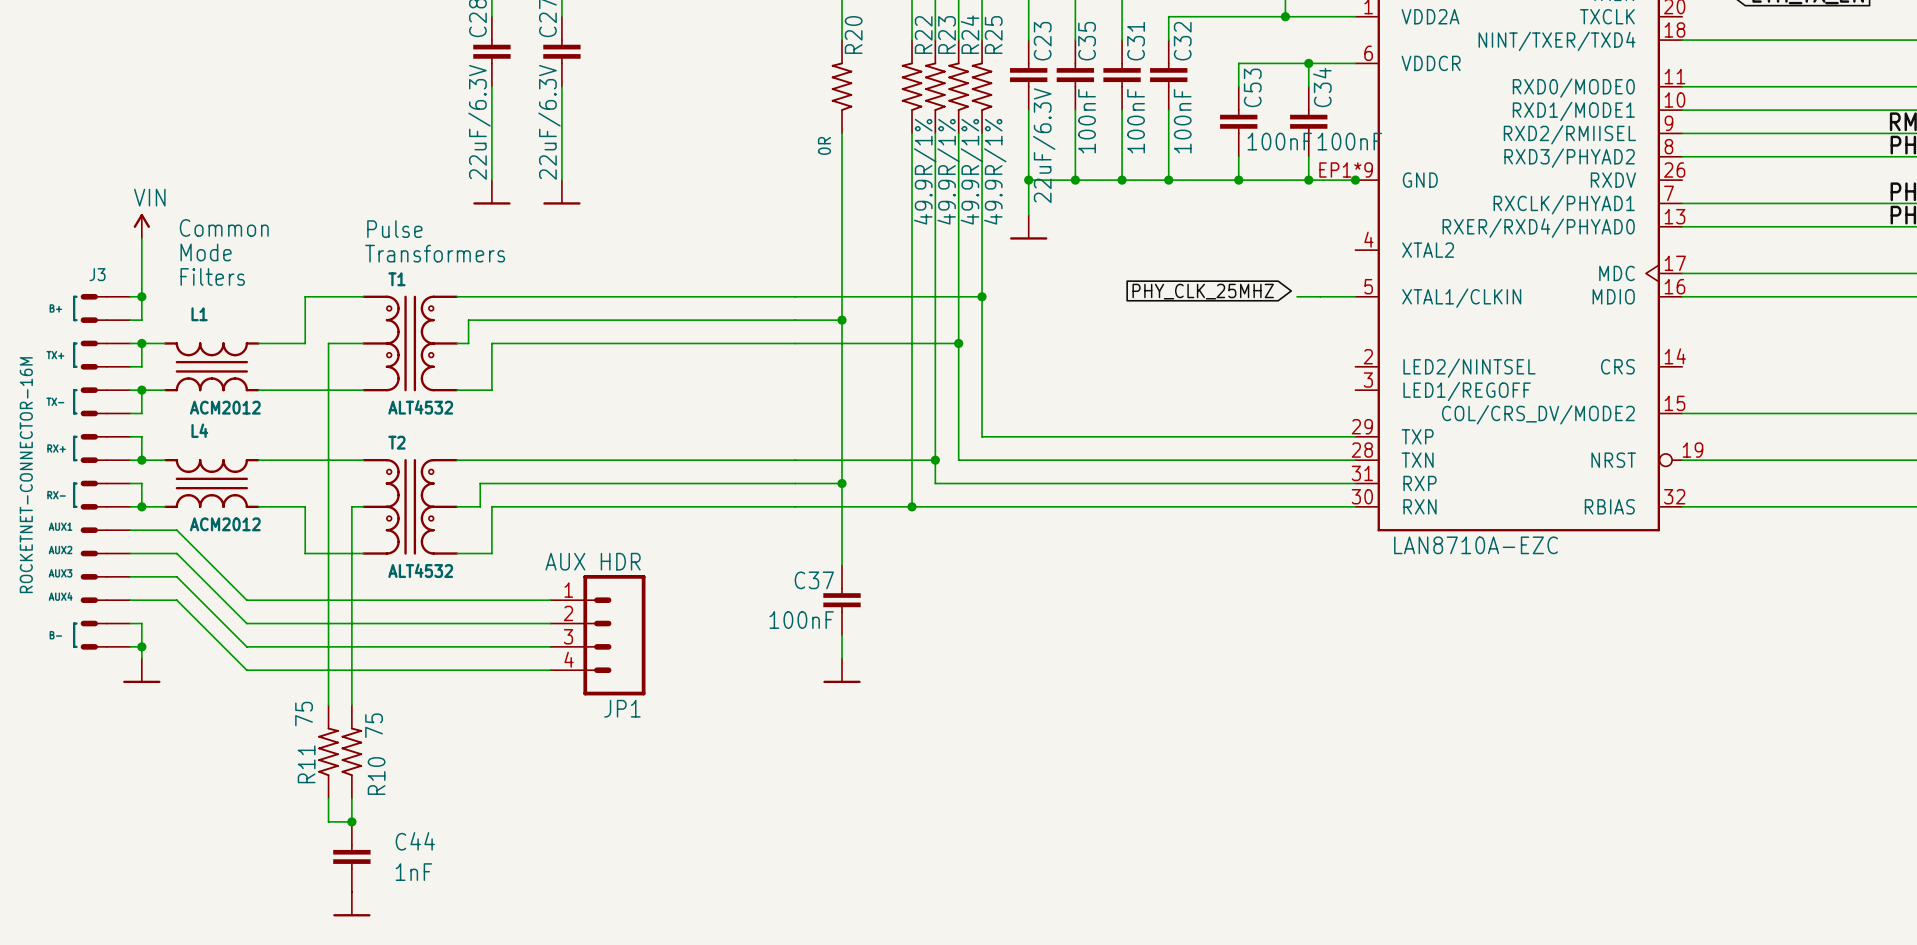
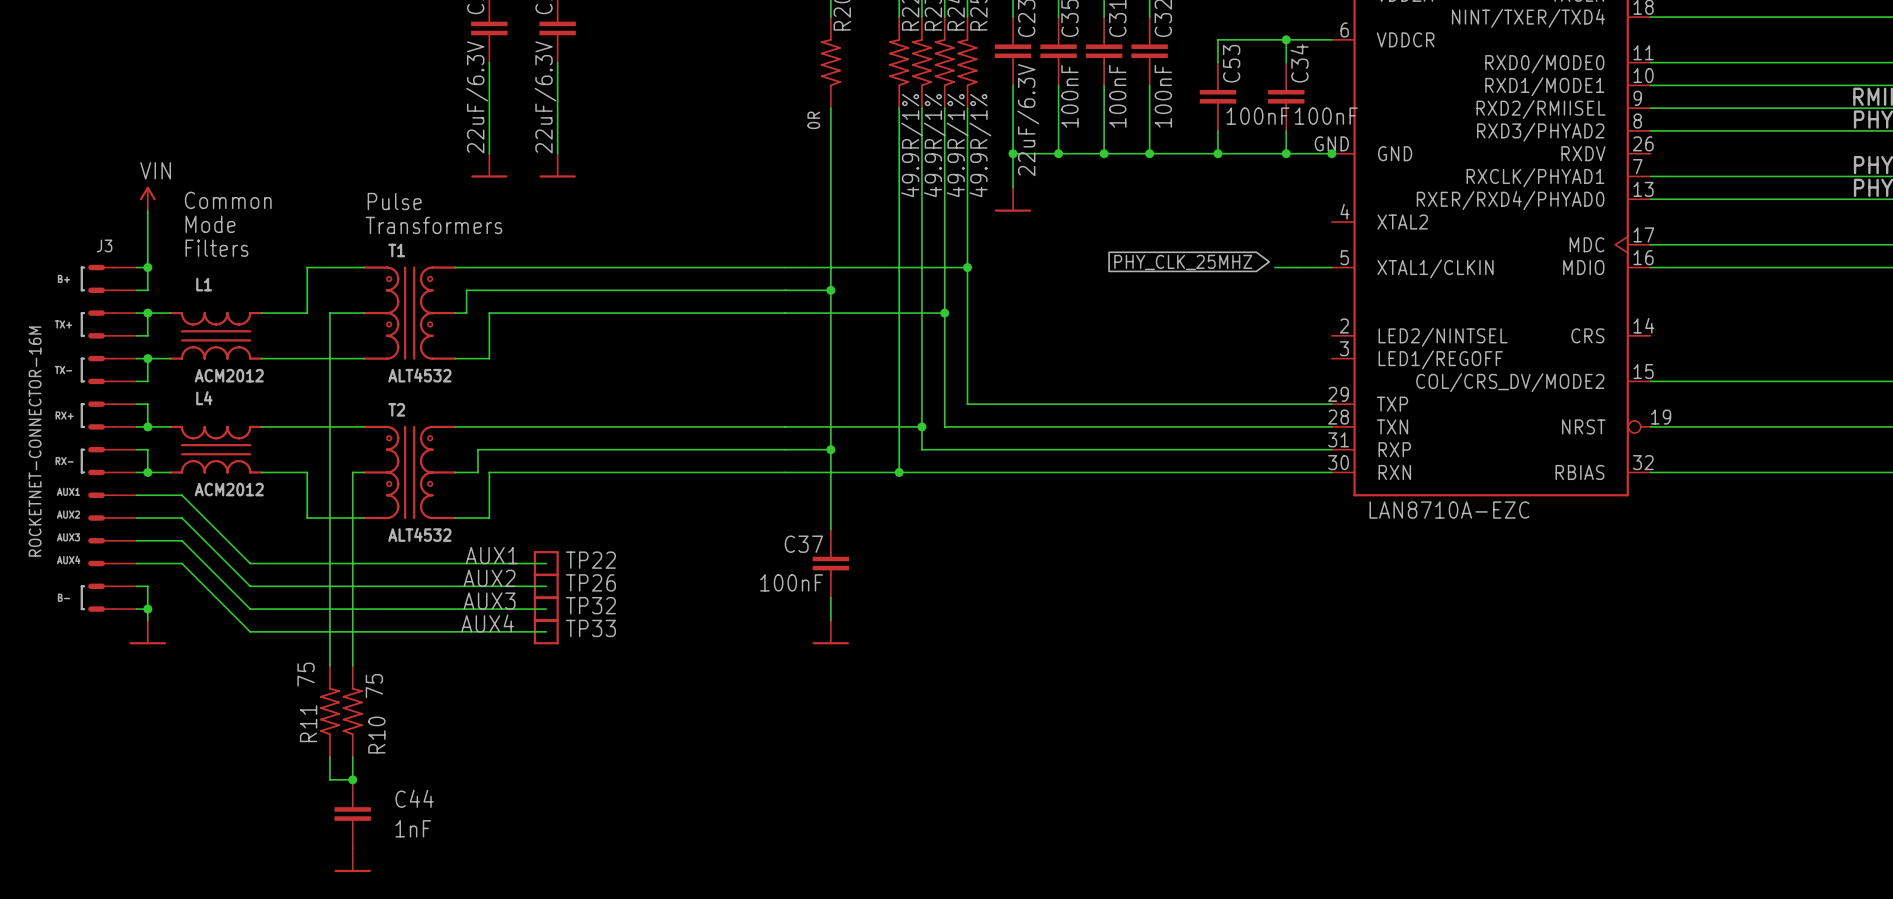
part pin number: EP1*9 (1346, 170) -> GND (1331, 143)
label: none -> AUX1 (491, 555)
TP22: none -> (546, 563)
label: none -> AUX2 (489, 578)
TP26: none -> (546, 586)
JP1: AUX HDR (597, 635) -> none
label: none -> AUX3 (489, 601)
TP32: none -> (546, 609)
label: none -> AUX4 (487, 623)
TP33: none -> (546, 631)

